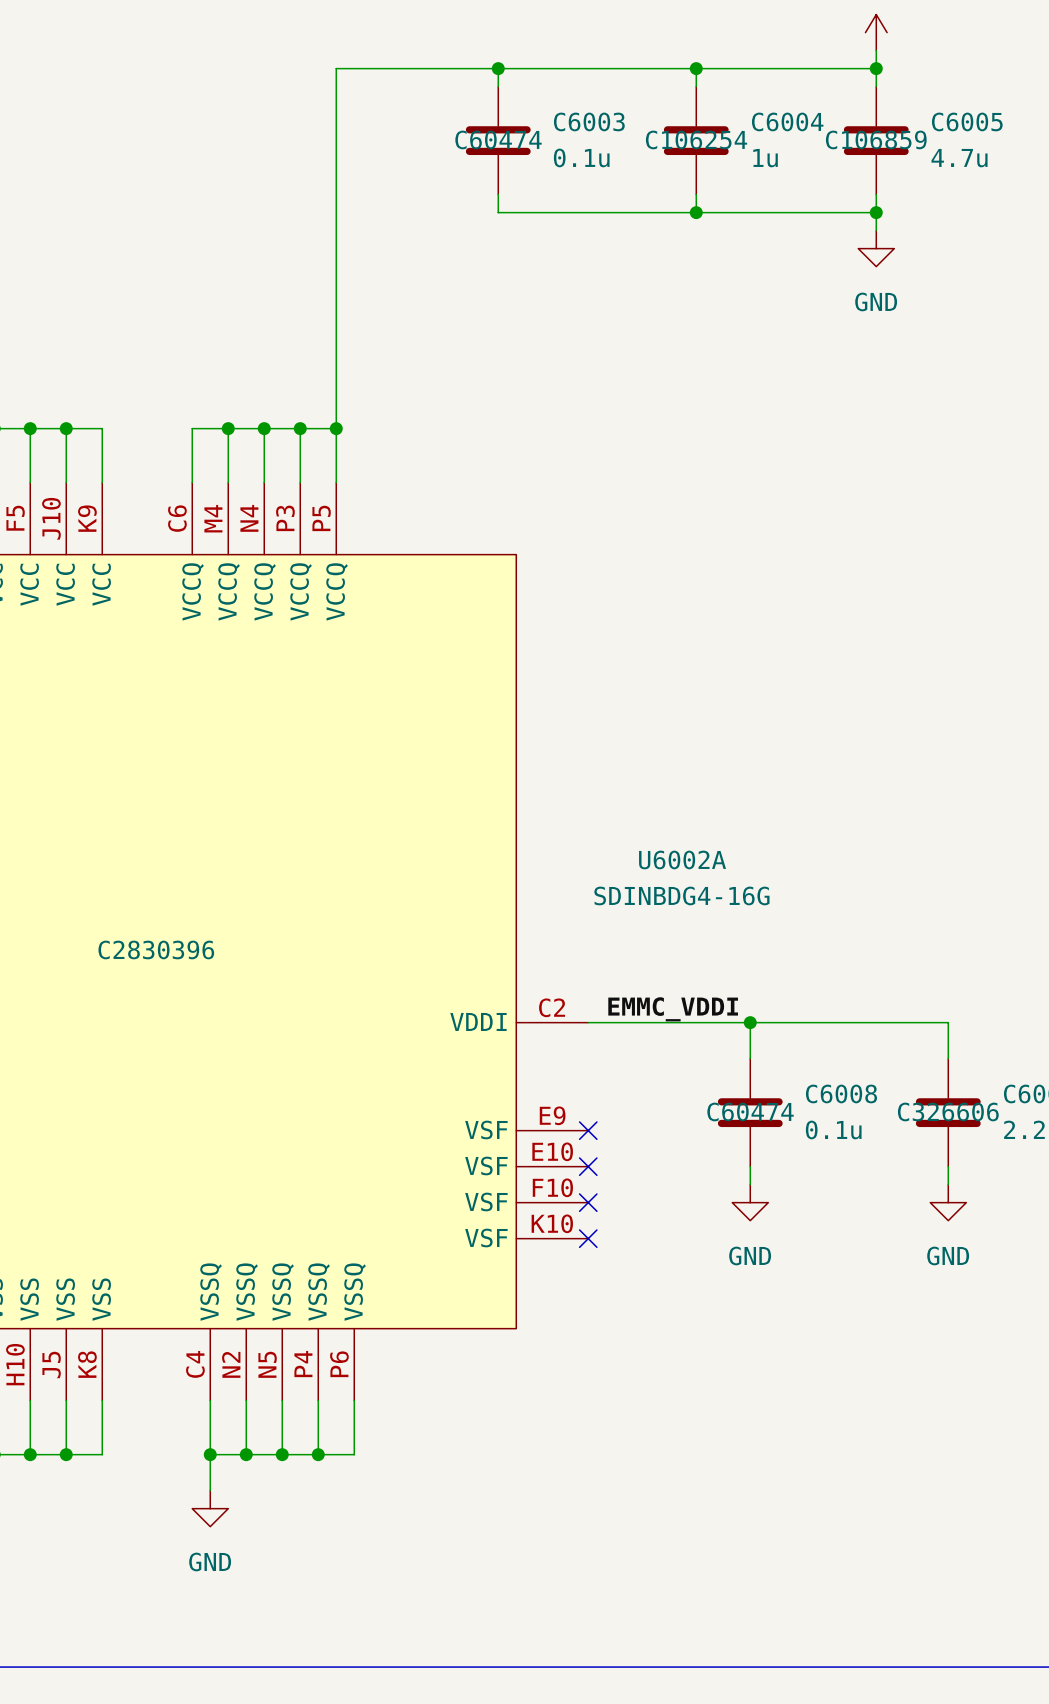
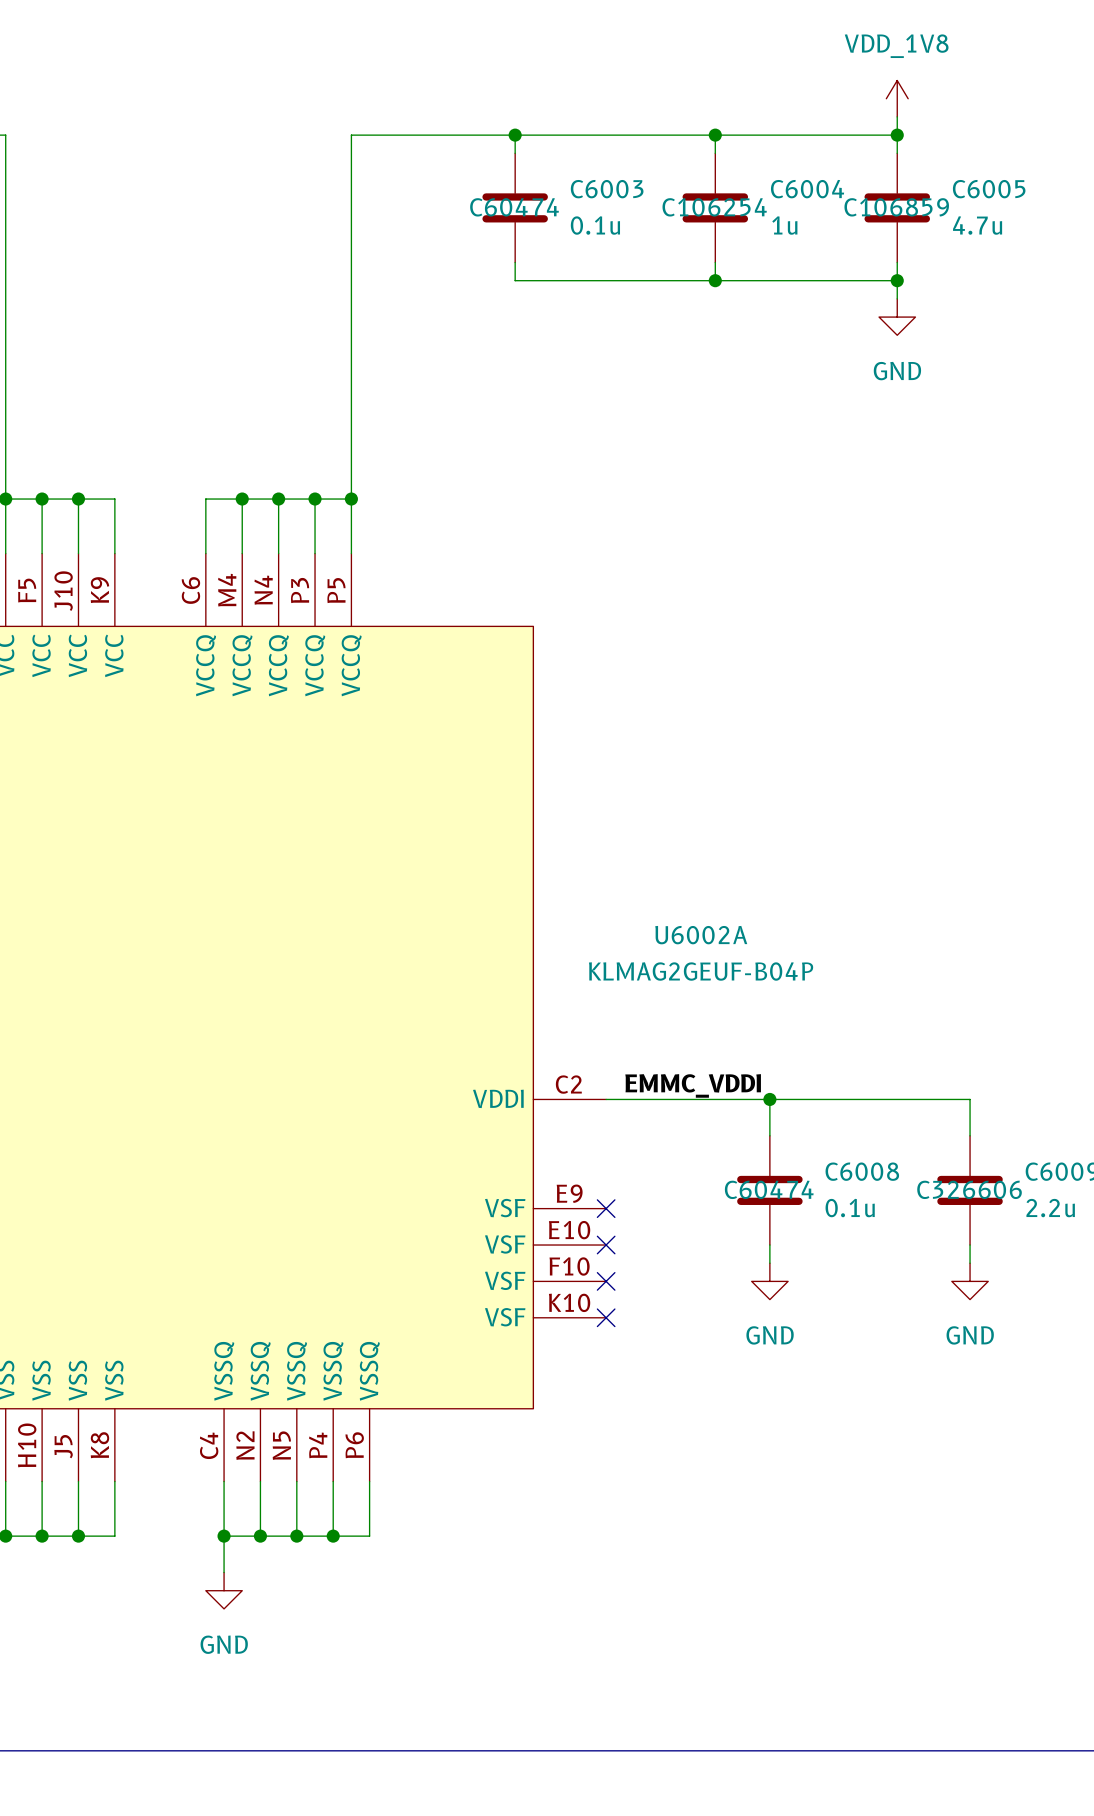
U6002A value: SDINBDG4-16G (681, 895) -> KLMAG2GEUF-B04P (701, 971)
U6002A text: C2830396 (156, 949) -> none

